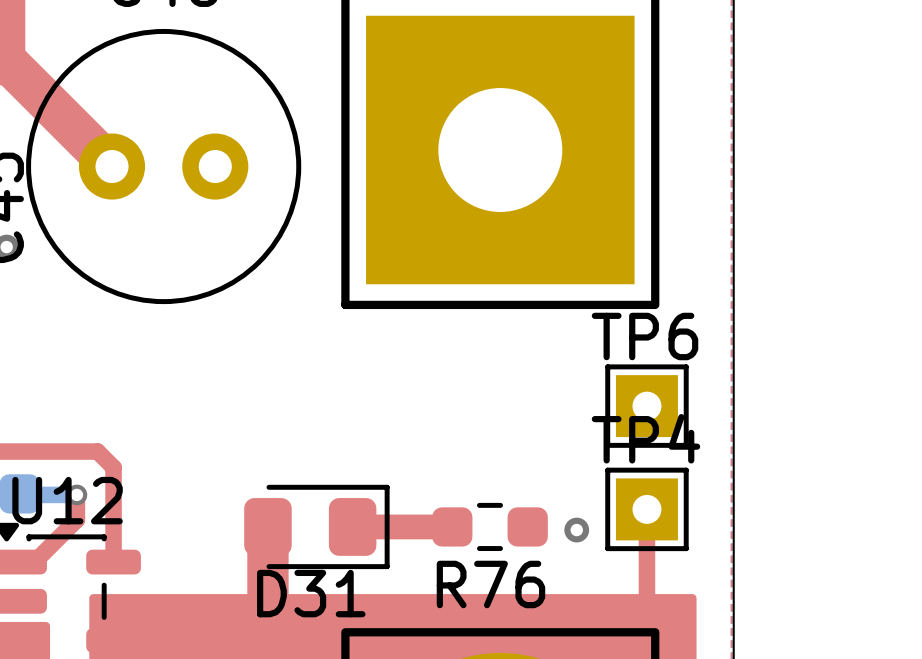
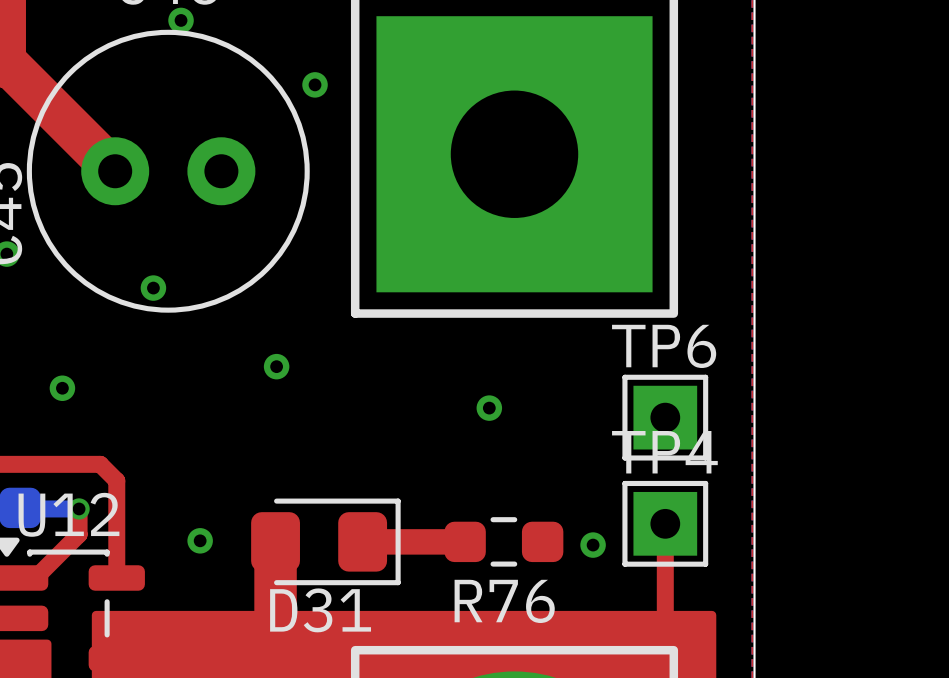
via: none -> (181, 20)
via: none -> (315, 84)
via: none -> (153, 288)
via: none -> (276, 366)
via: none -> (62, 388)
via: none -> (489, 408)
via: none -> (200, 540)

